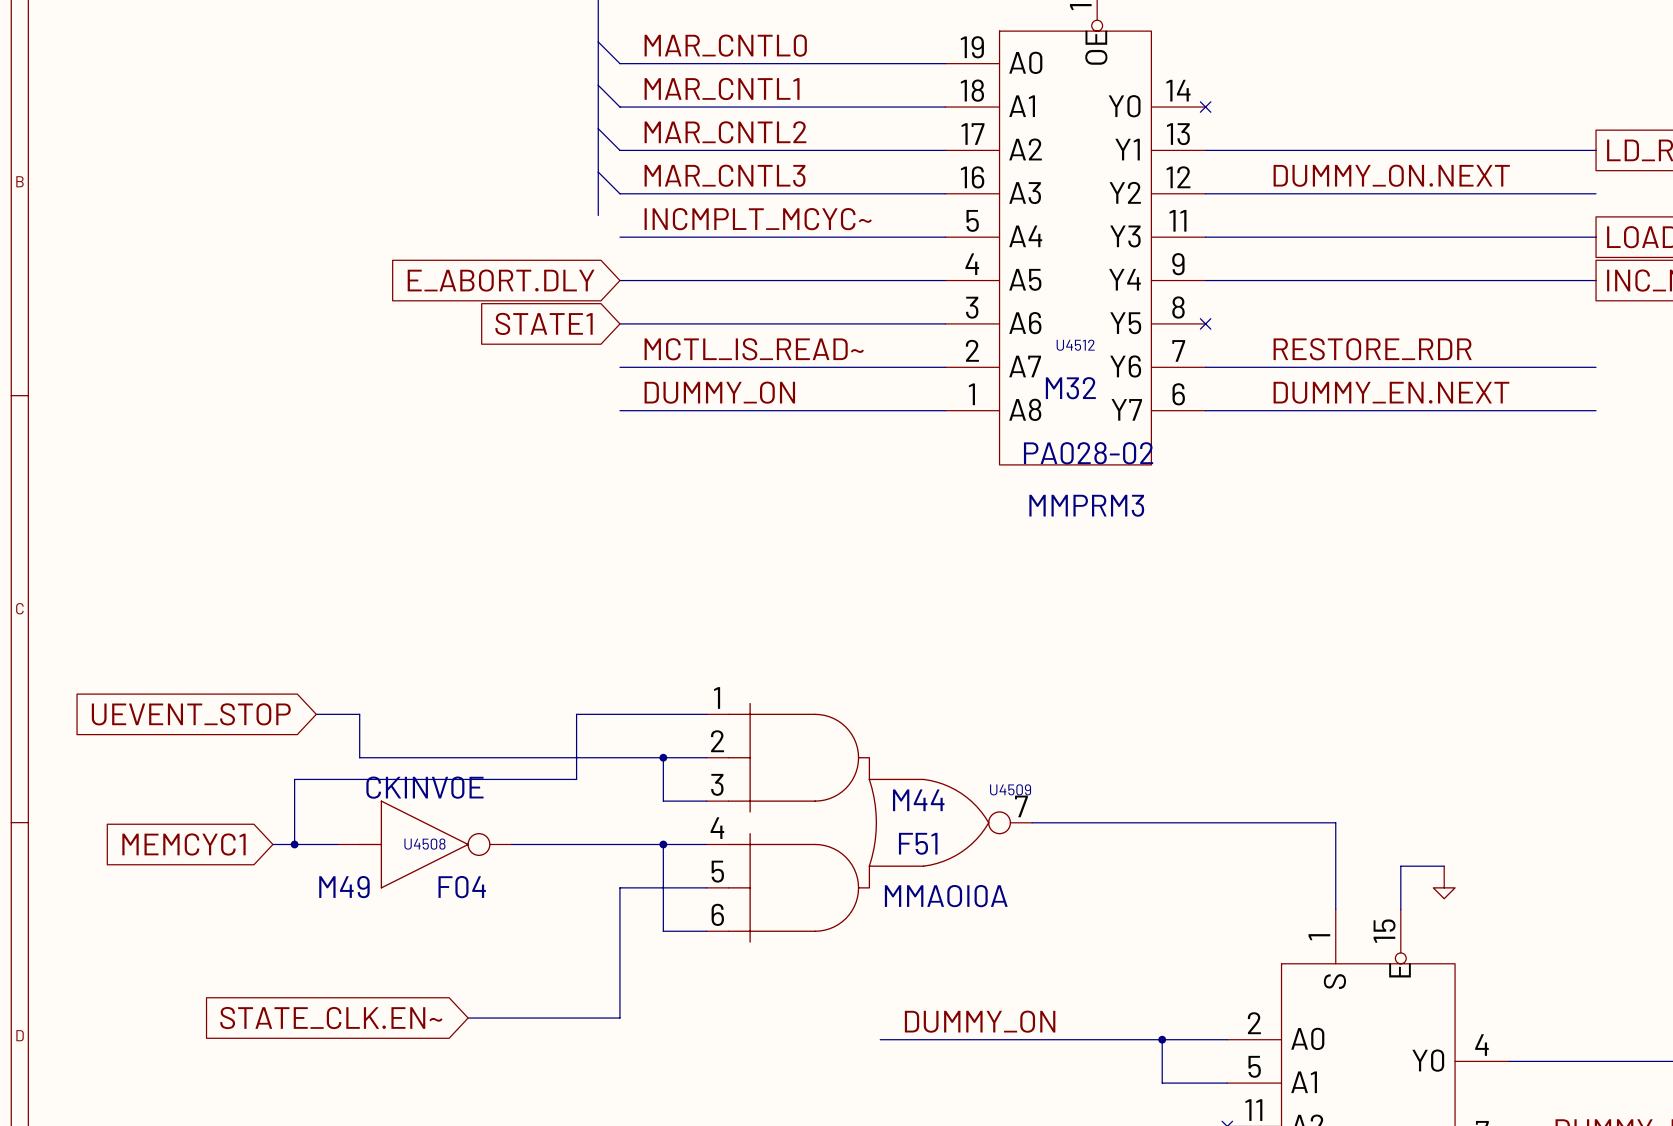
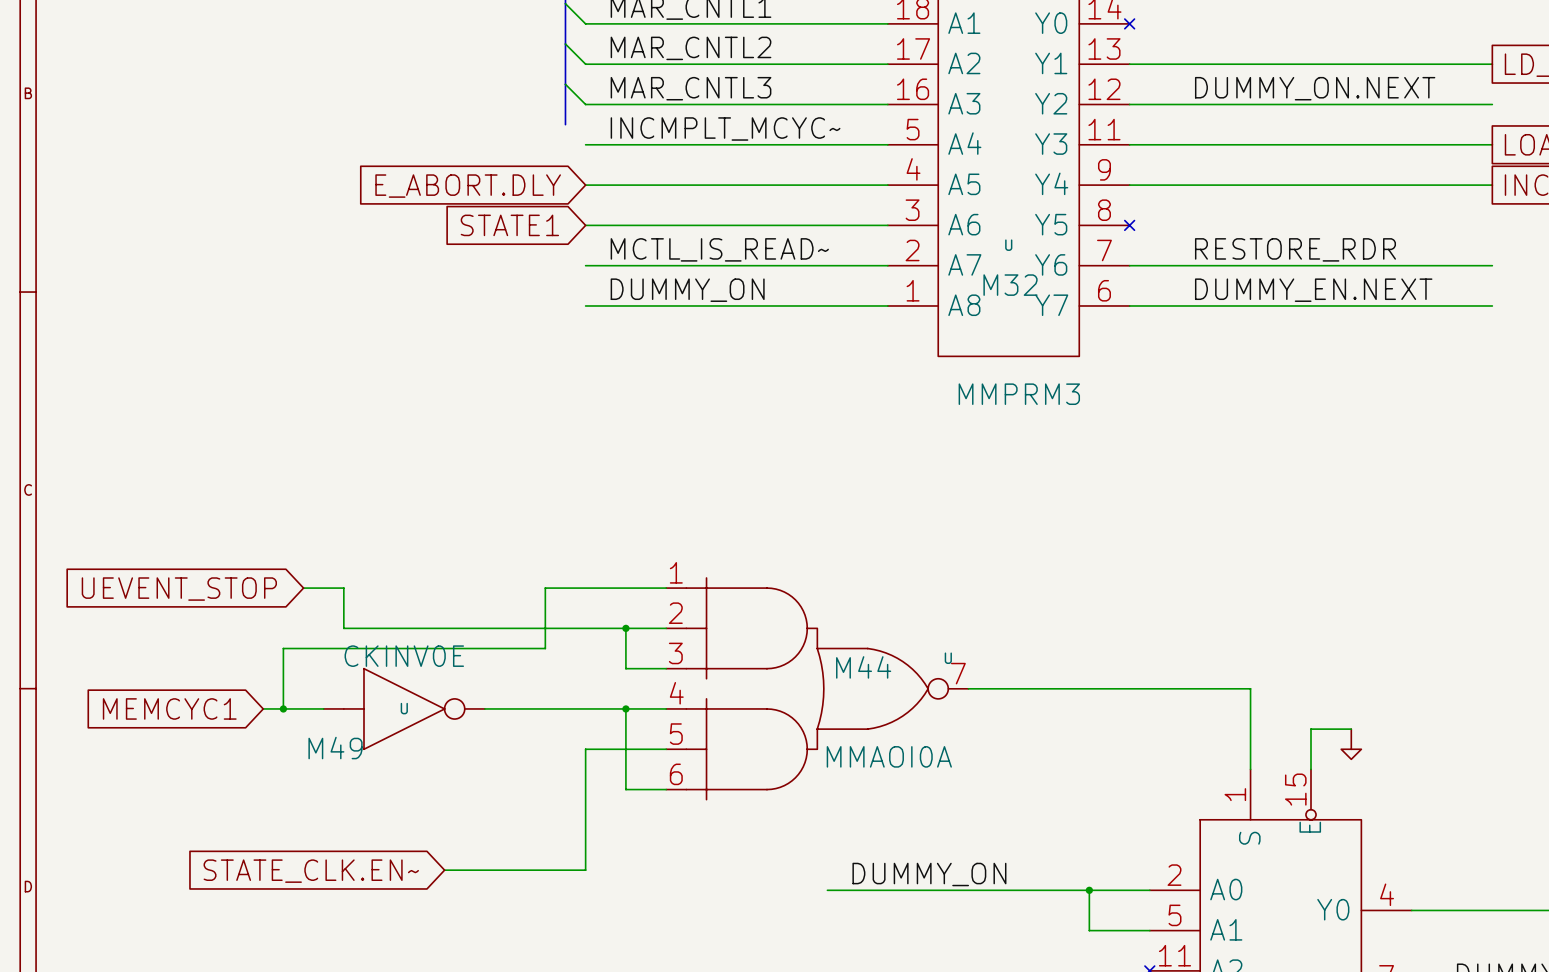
U4512 name: U4512 (1075, 345) -> U (1008, 245)
U4512 value: PA028-02 (1088, 453) -> none
U4509 name: U4509 (1010, 789) -> U (948, 658)
U4509 value: F51 (918, 843) -> none
U4508 name: U4508 (424, 844) -> U (404, 708)
U4508 value: F04 (462, 887) -> none

